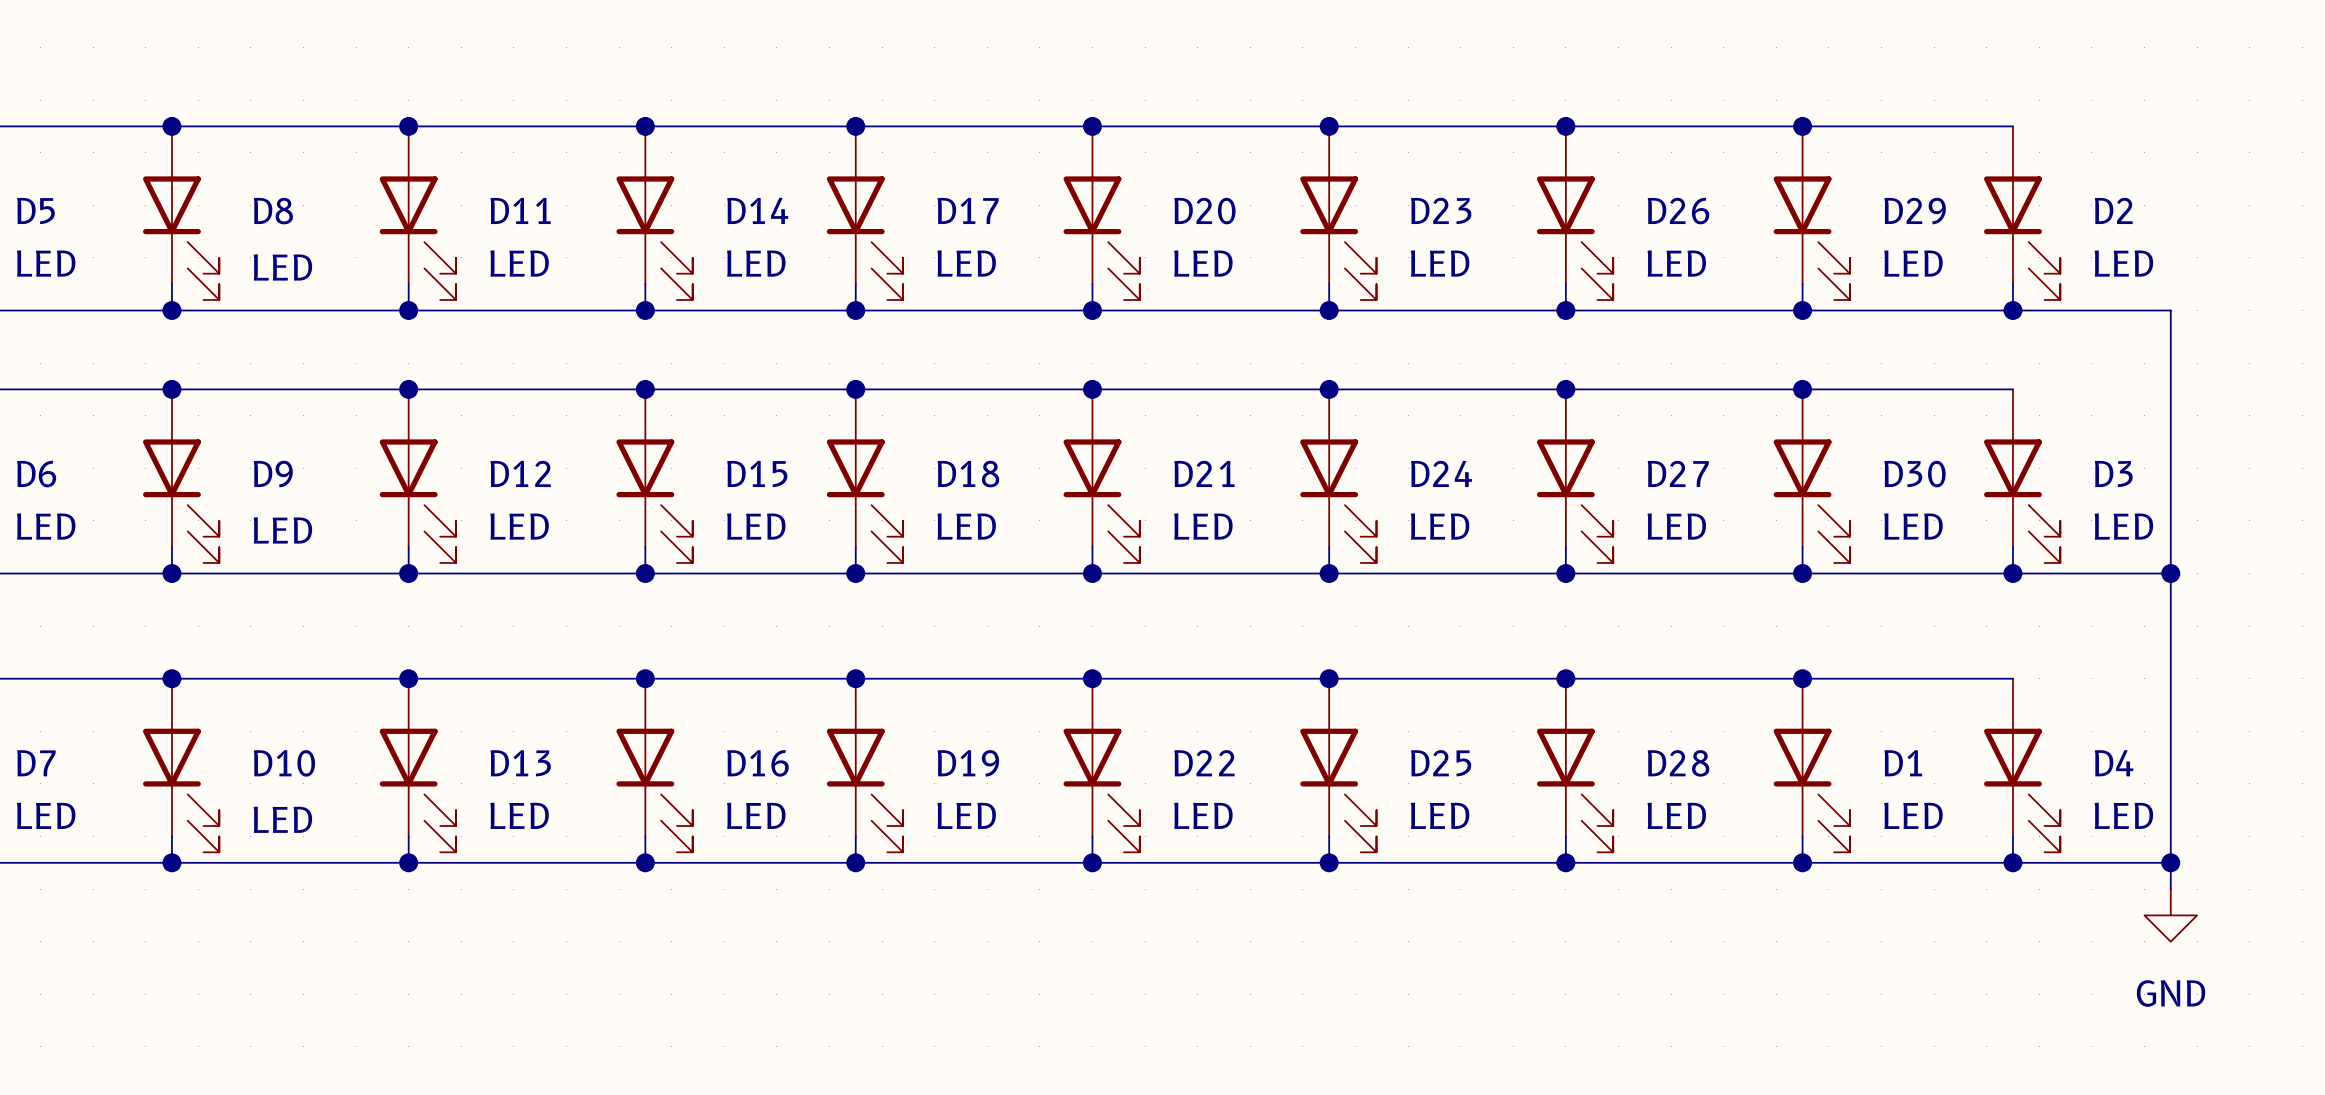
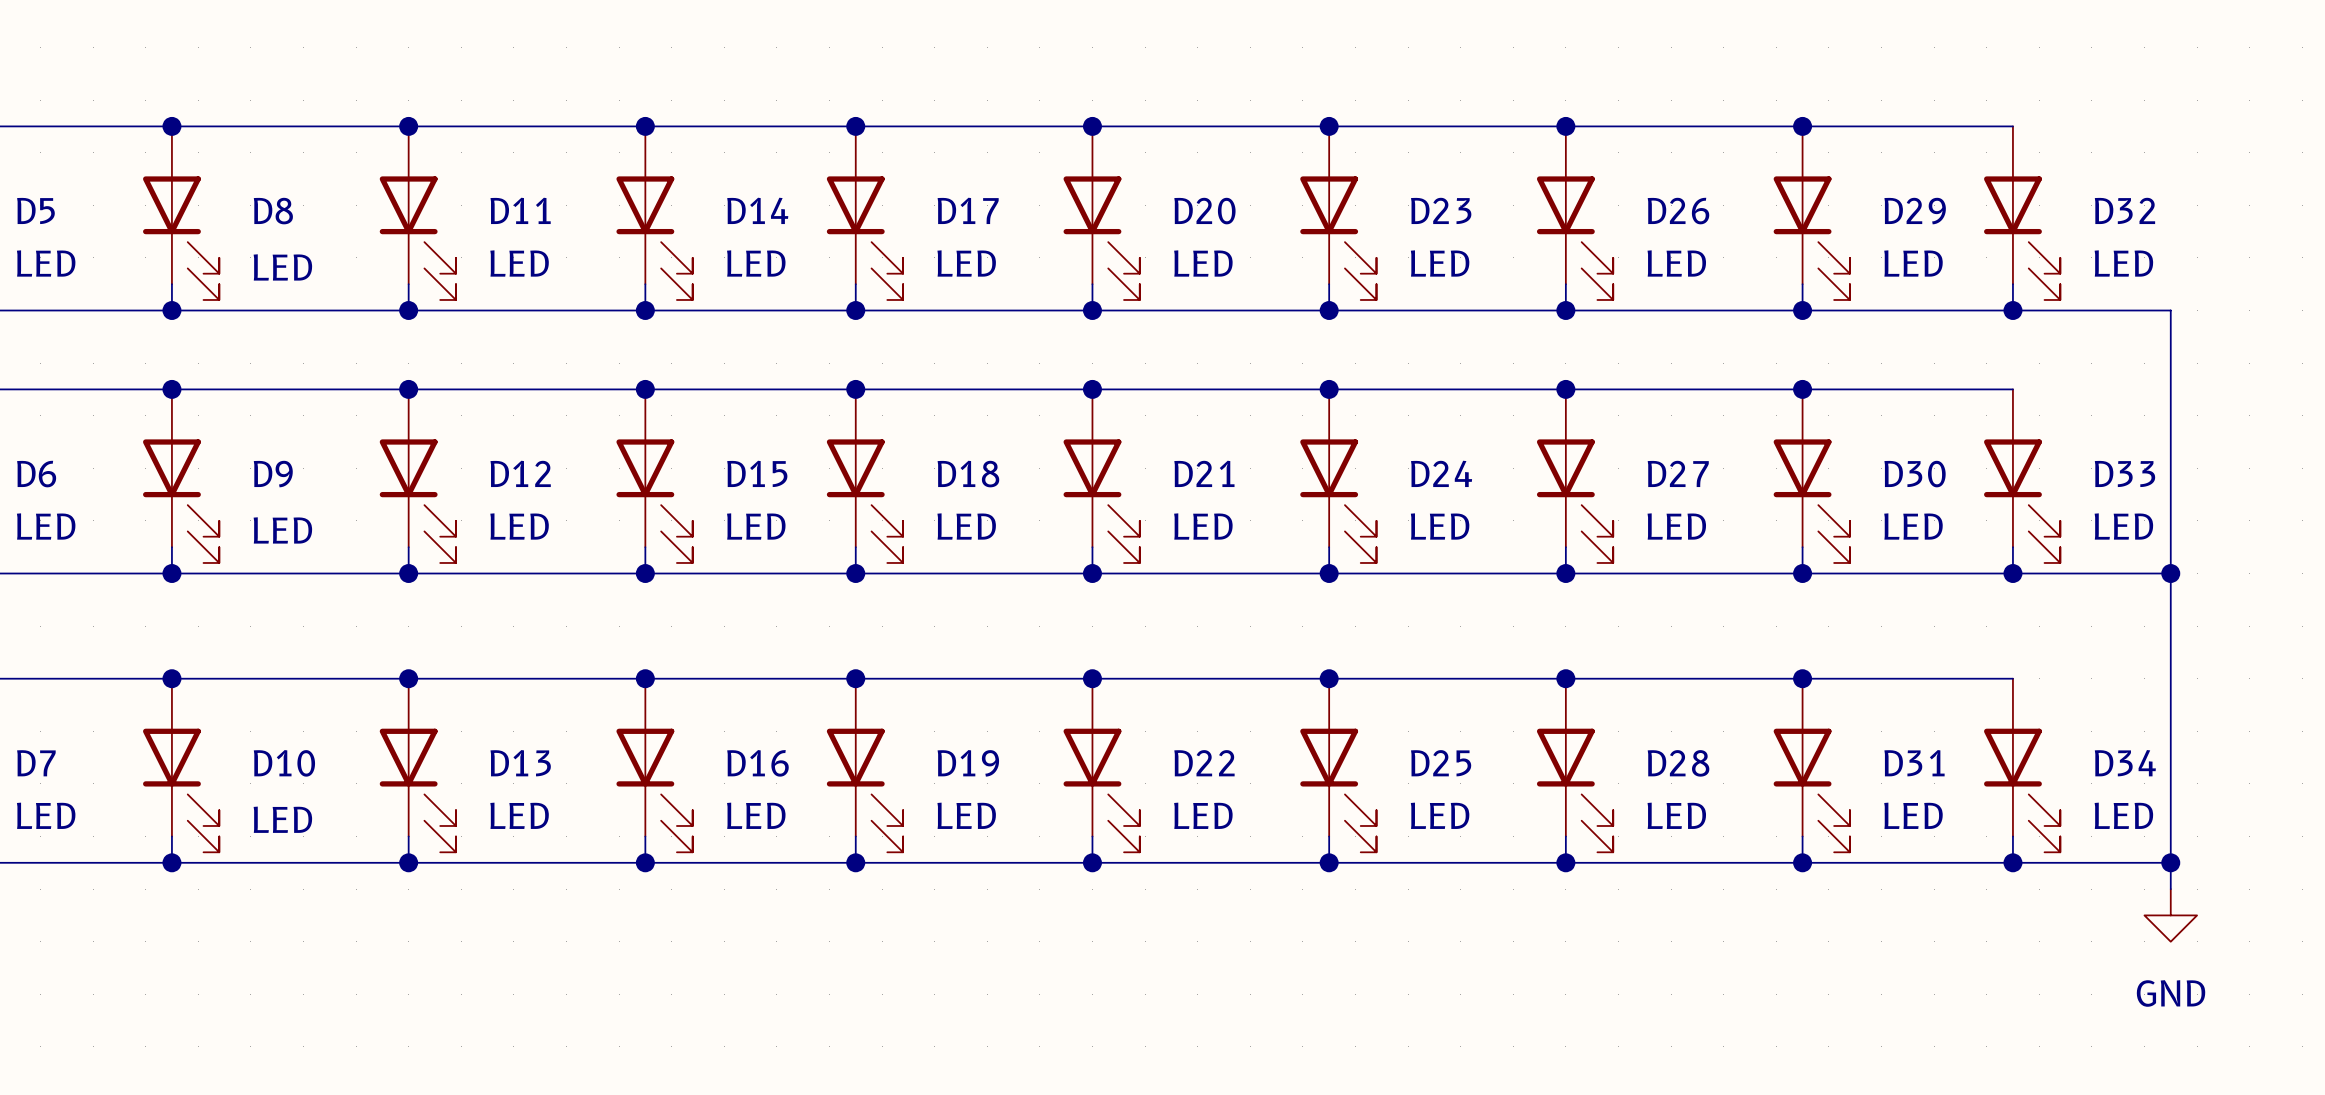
D2 name: D2 (2113, 210) -> D32 (2124, 210)
D3 name: D3 (2113, 473) -> D33 (2124, 473)
D1 name: D1 (1903, 763) -> D31 (1914, 763)
D4 name: D4 (2114, 763) -> D34 (2125, 763)

